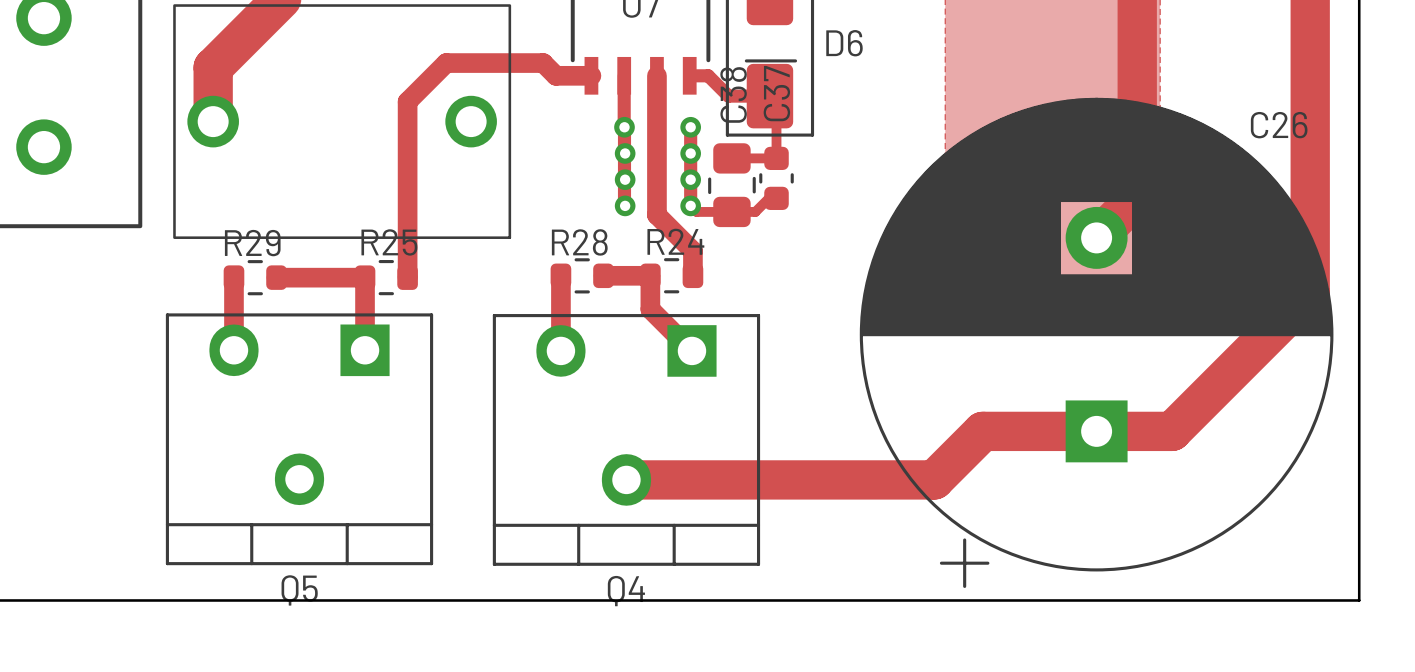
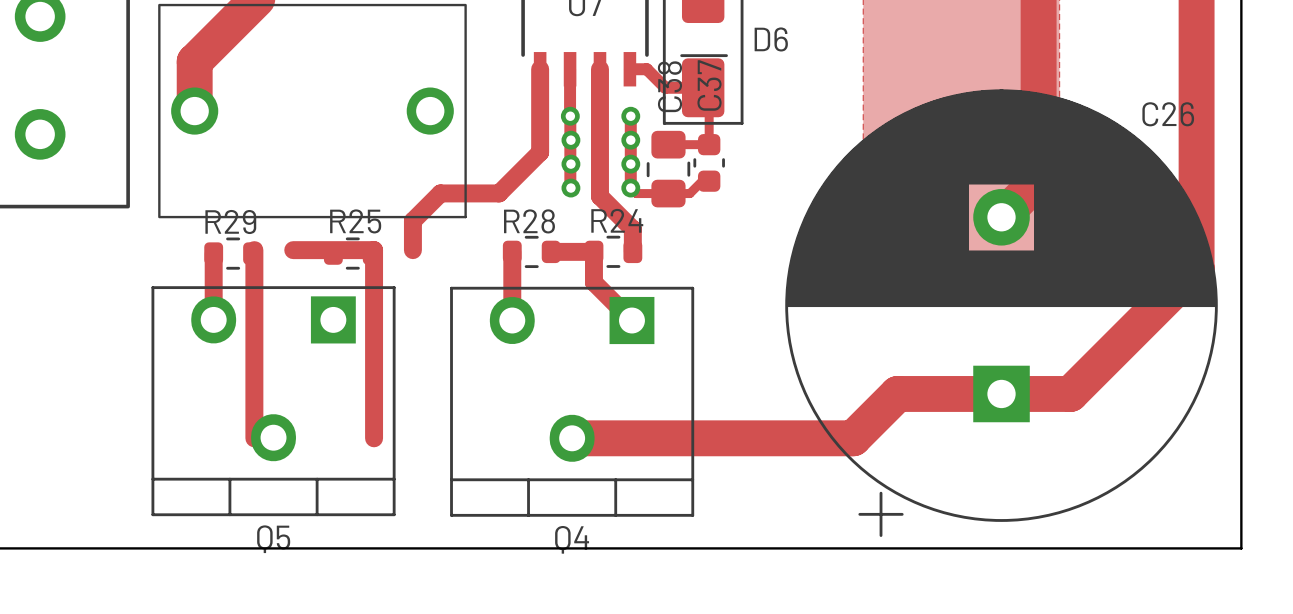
track: (591, 75) (556, 75) (543, 63) (446, 63) (407, 101) (407, 277) -> (540, 69) (540, 152) (499, 193) (440, 193) (412, 220) (412, 250)
track: none -> (254, 250) (254, 438)
track: none -> (293, 250) (374, 250) (374, 438)
track: (276, 277) (365, 277) (365, 350) -> none

